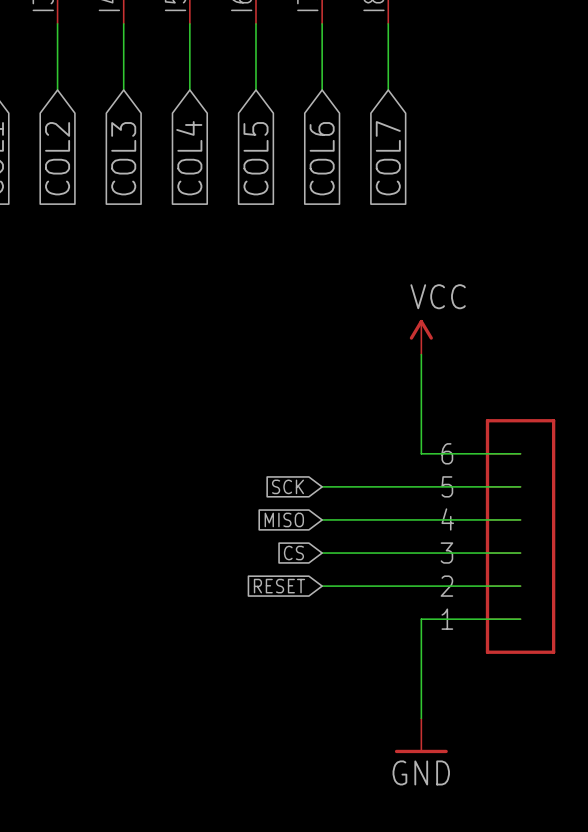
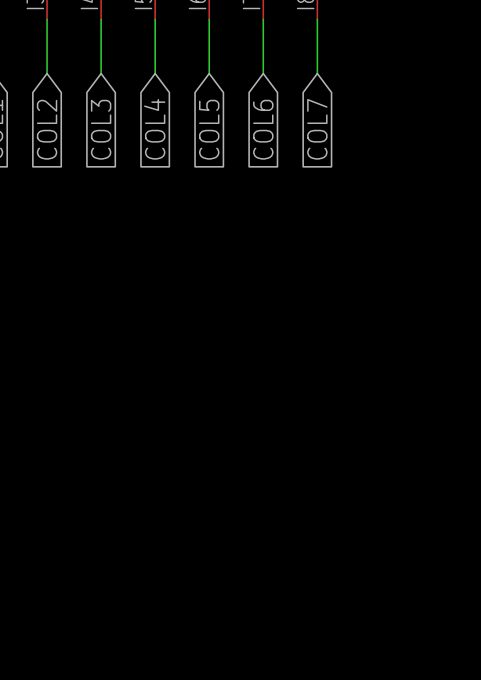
power symbol: VCC (421, 337) -> none
wire: (421, 354) (421, 453) (520, 453) -> none
global label: SCK (287, 486) -> none
wire: (322, 486) (520, 486) -> none
global label: MISO (284, 519) -> none
wire: (322, 519) (520, 519) -> none
part: (520, 536) -> none
global label: CS (293, 553) -> none
wire: (322, 553) (520, 553) -> none
global label: RESET (279, 586) -> none
wire: (322, 586) (520, 586) -> none
wire: (520, 619) (421, 619) (421, 718) -> none
power symbol: GND (421, 735) -> none

